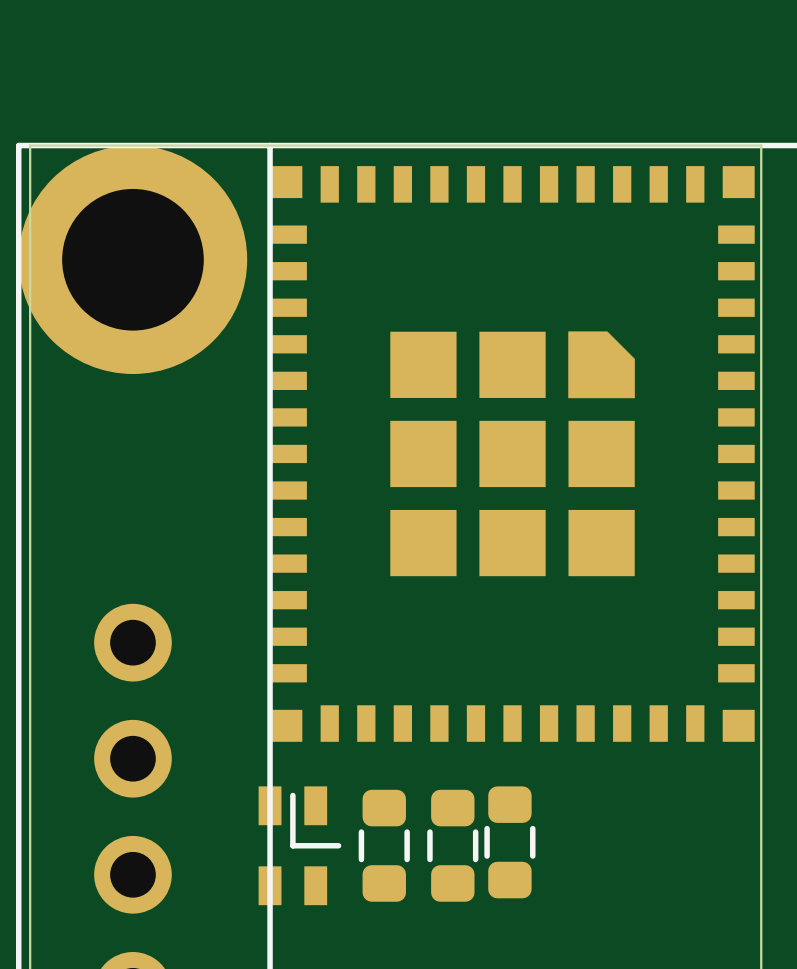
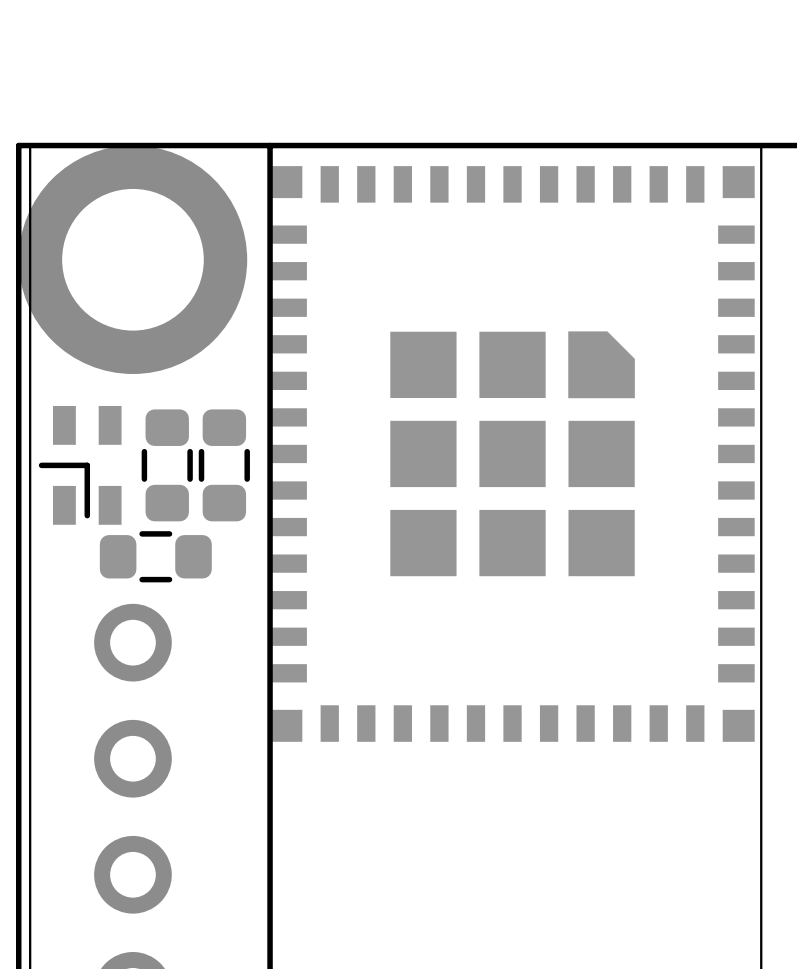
part: none -> (167, 465)
part: none -> (224, 465)
part: none -> (155, 556)
part: (509, 842) -> none
part rotation: 0° (299, 845) -> 180° (80, 465)
part position: (299, 845) -> (80, 465)
part: (384, 845) -> none
part: (452, 845) -> none

